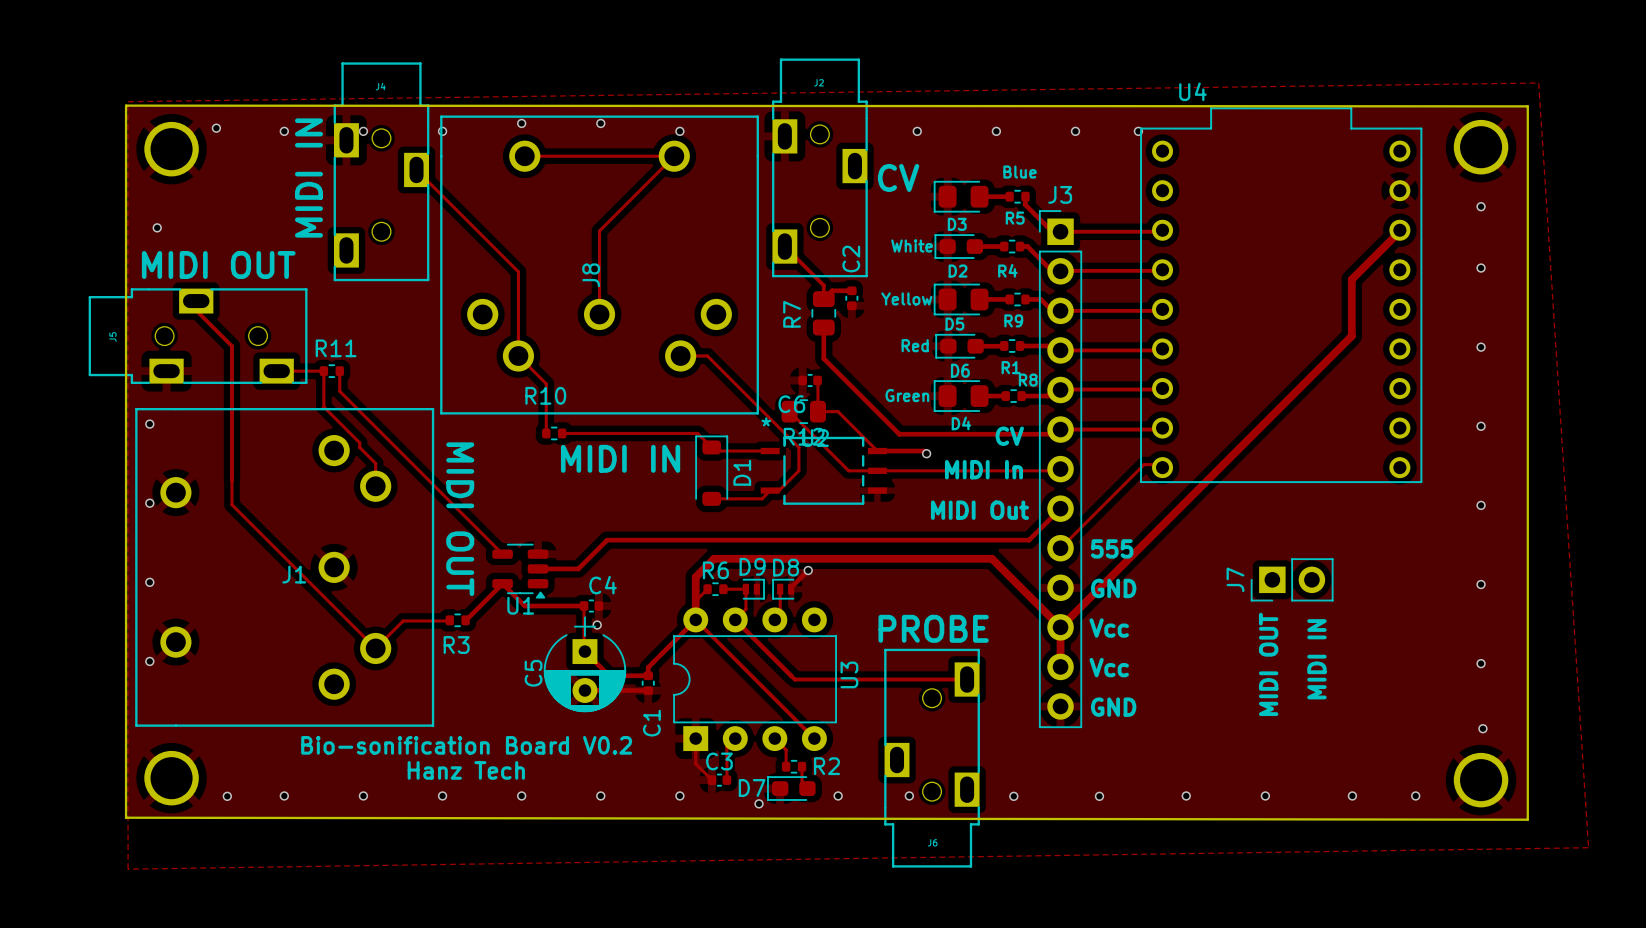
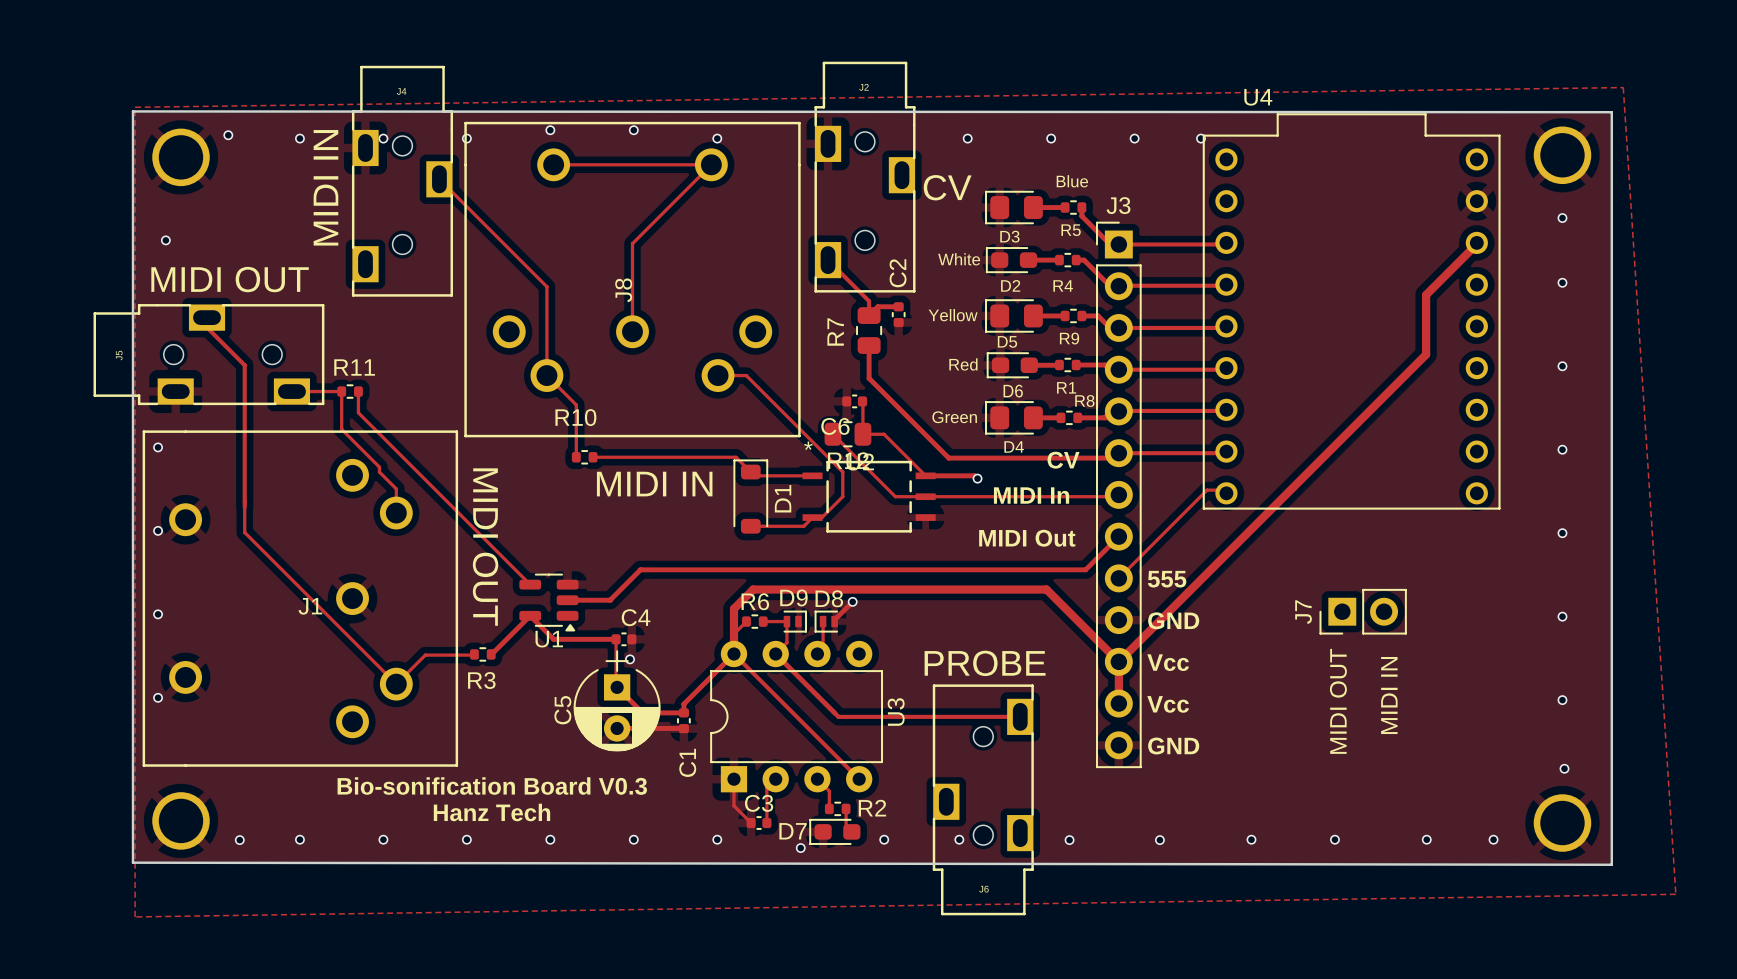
text: Bio-sonification Board V0.2 (466, 745) -> Bio-sonification Board V0.3 (492, 786)

